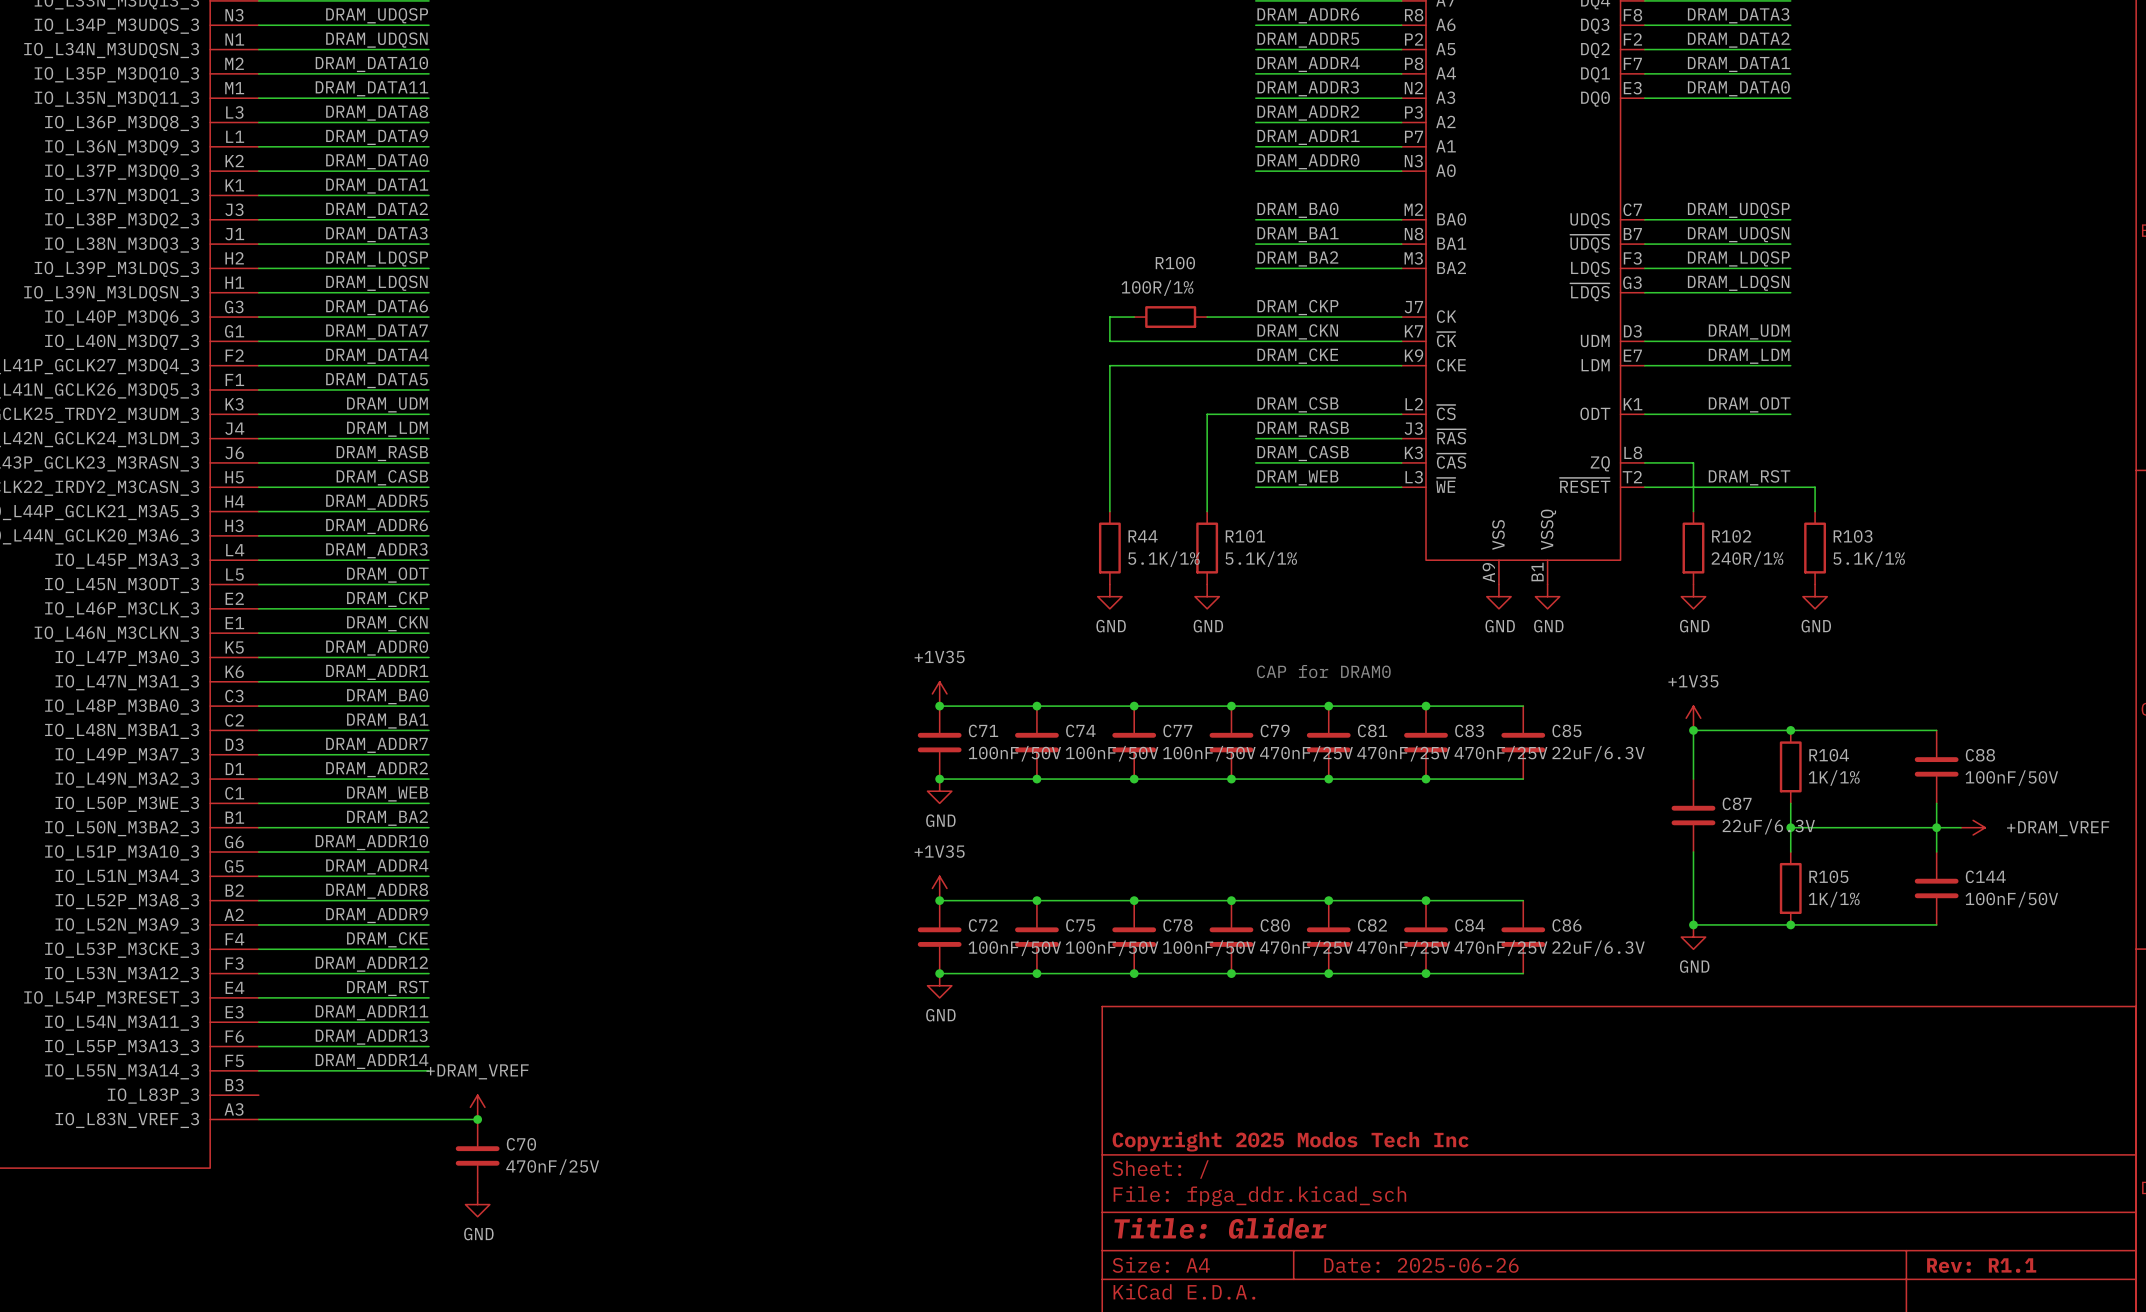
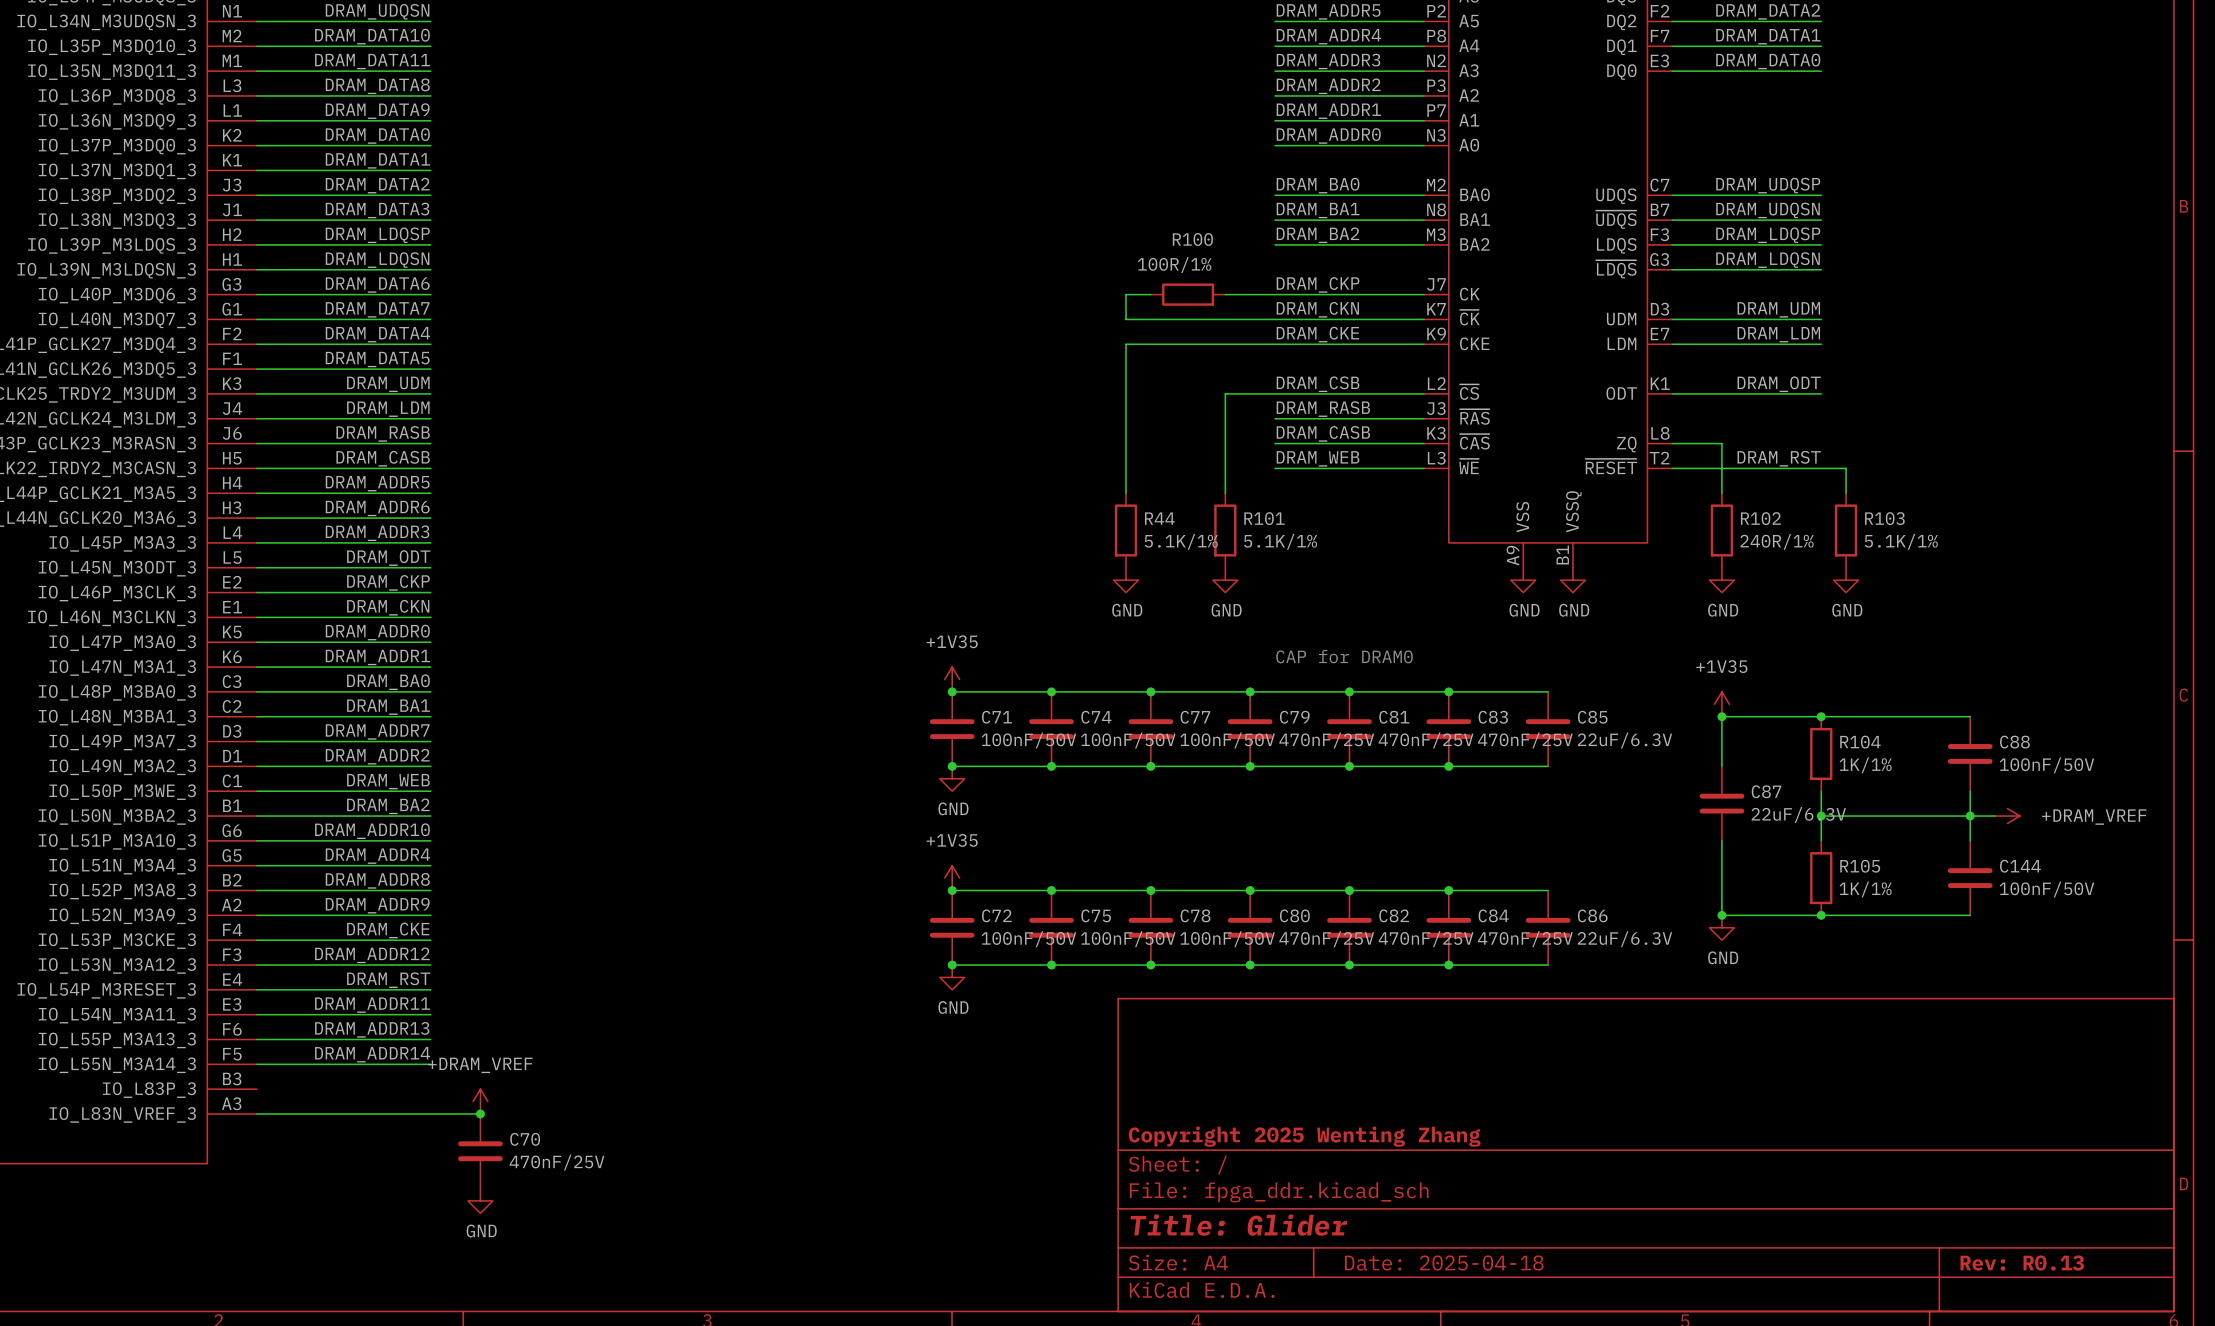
title block: Copyright 2025 Modos Tech Inc (1290, 1141) -> Copyright 2025 Wenting Zhang (1304, 1136)
title block: Date: 2025-06-26 (1421, 1265) -> Date: 2025-04-18 (1444, 1263)
title block: Rev: R1.1 (1981, 1265) -> Rev: R0.13 (2022, 1263)

